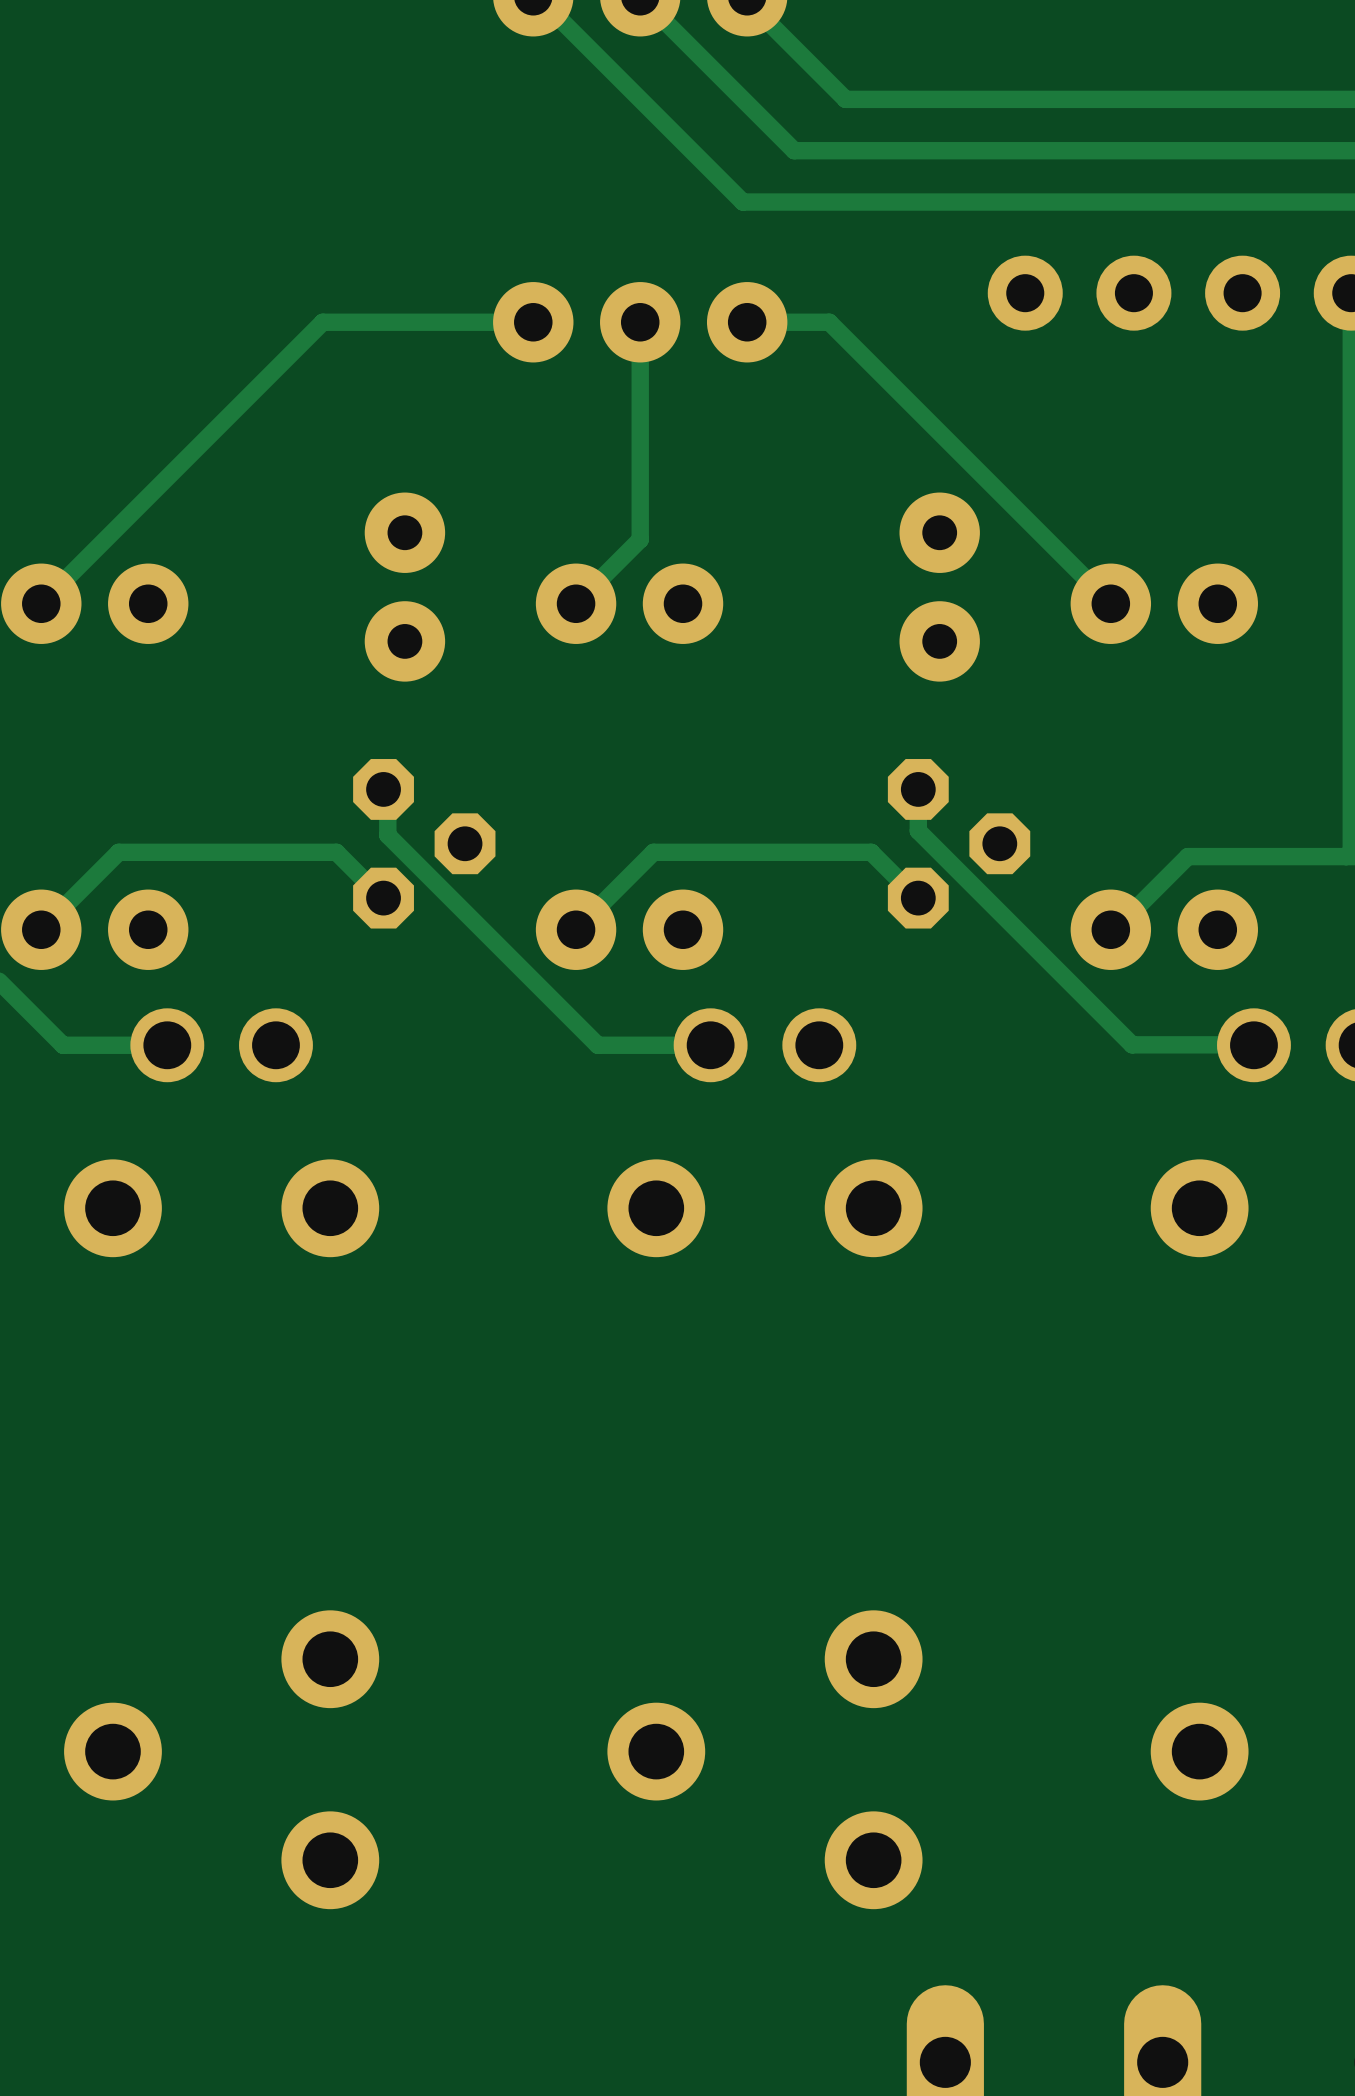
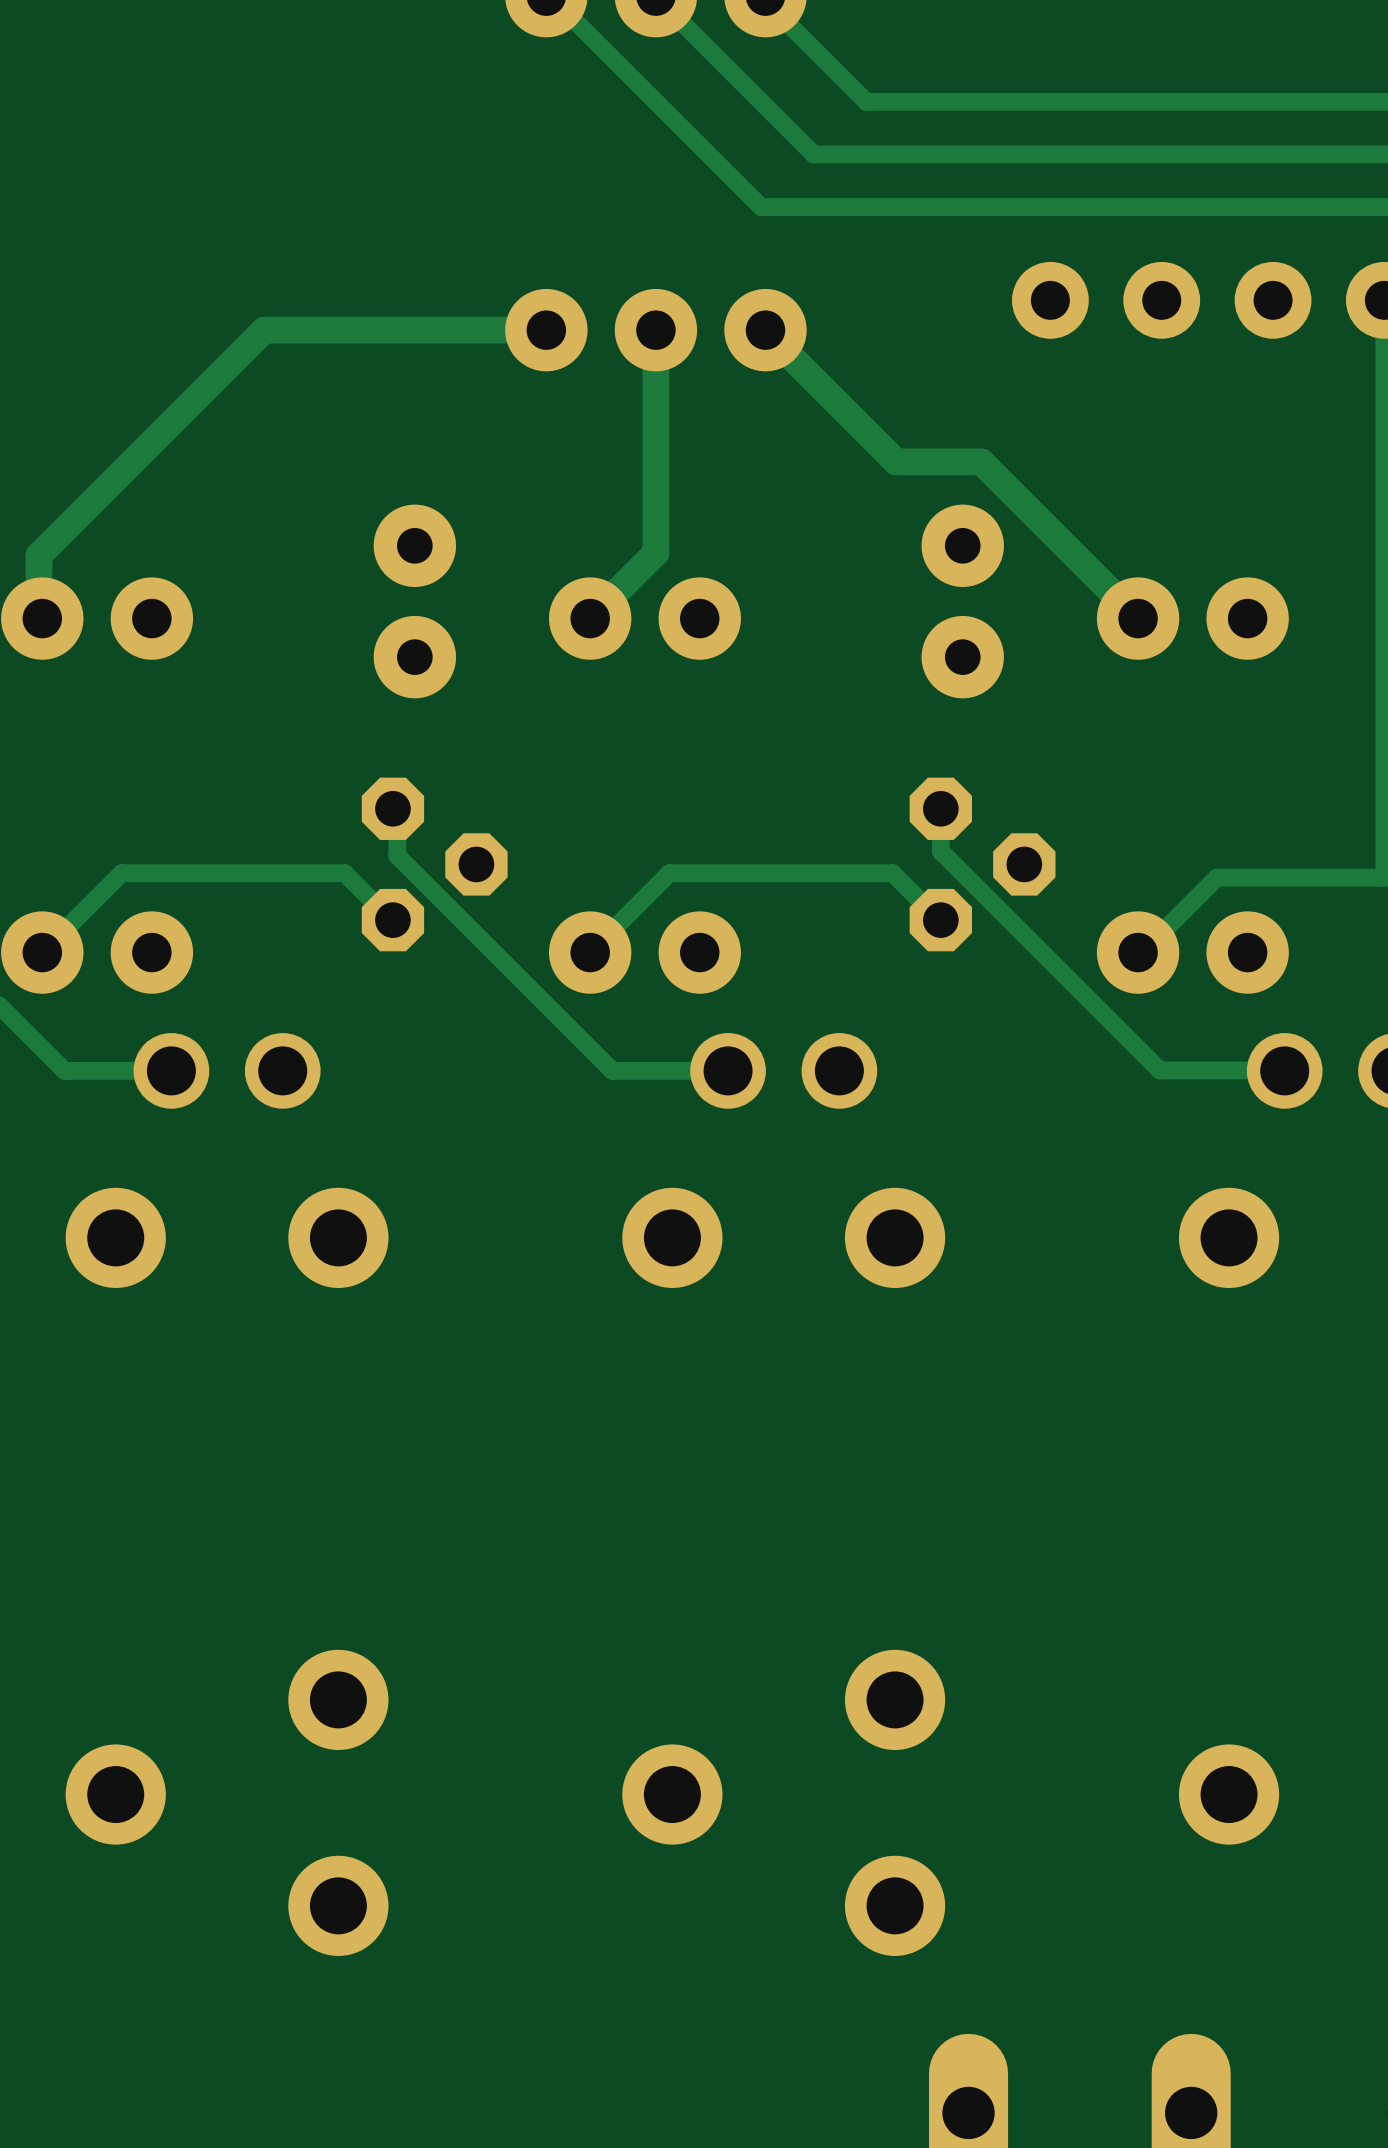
track: (322, 322) (41, 603) -> (330, 330) (264, 330) (38, 555) (38, 615) (42, 618)
track width: thin (533, 322) (322, 322) -> thick (546, 330) (330, 330)
track width: thin (640, 322) (640, 539) (576, 603) -> thick (655, 330) (655, 552) (590, 618)
track: (747, 322) (829, 322) (957, 450) -> (765, 330) (896, 461) (981, 461)
track width: thin (957, 450) (1110, 603) -> thick (981, 461) (1138, 618)

